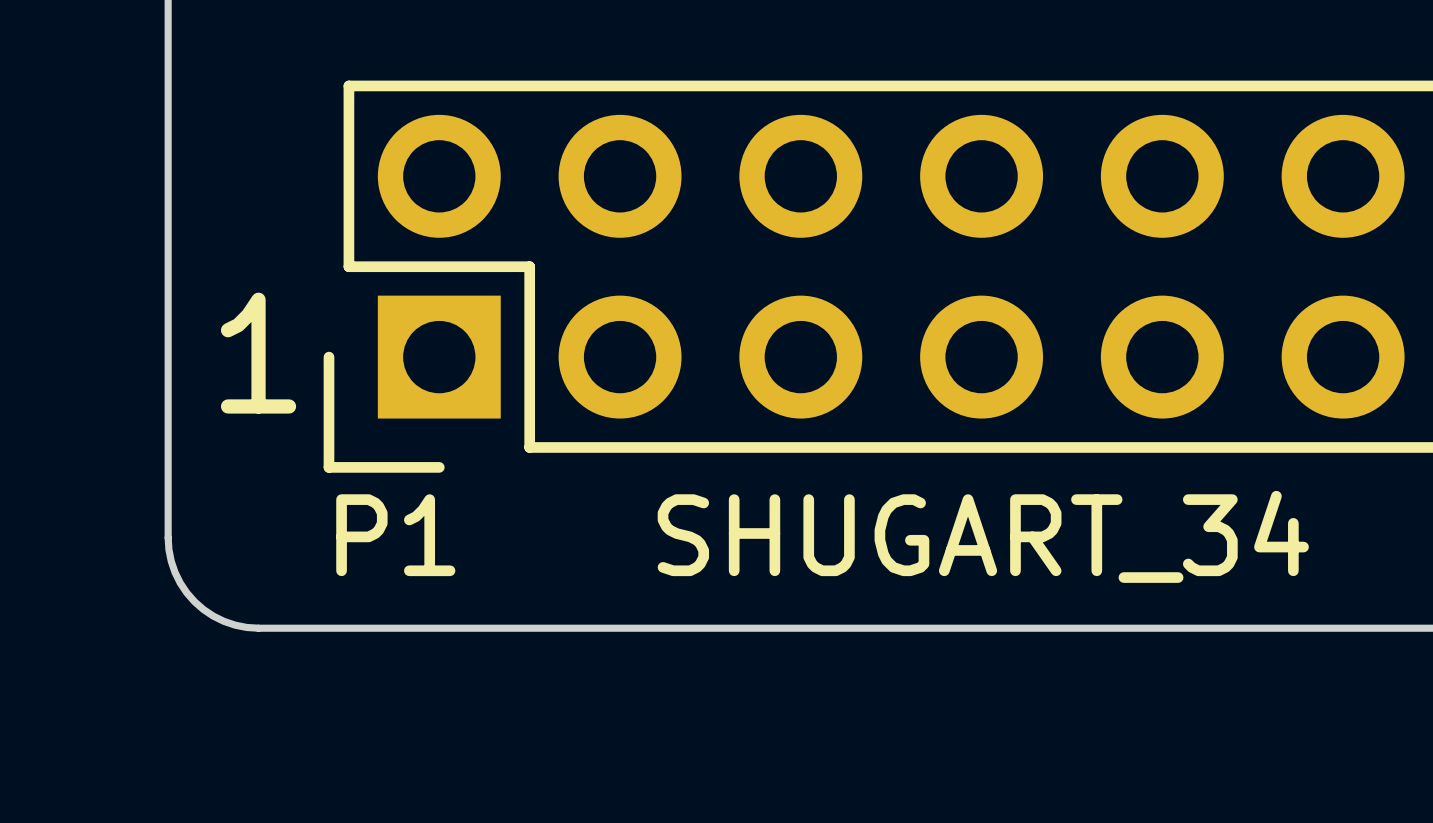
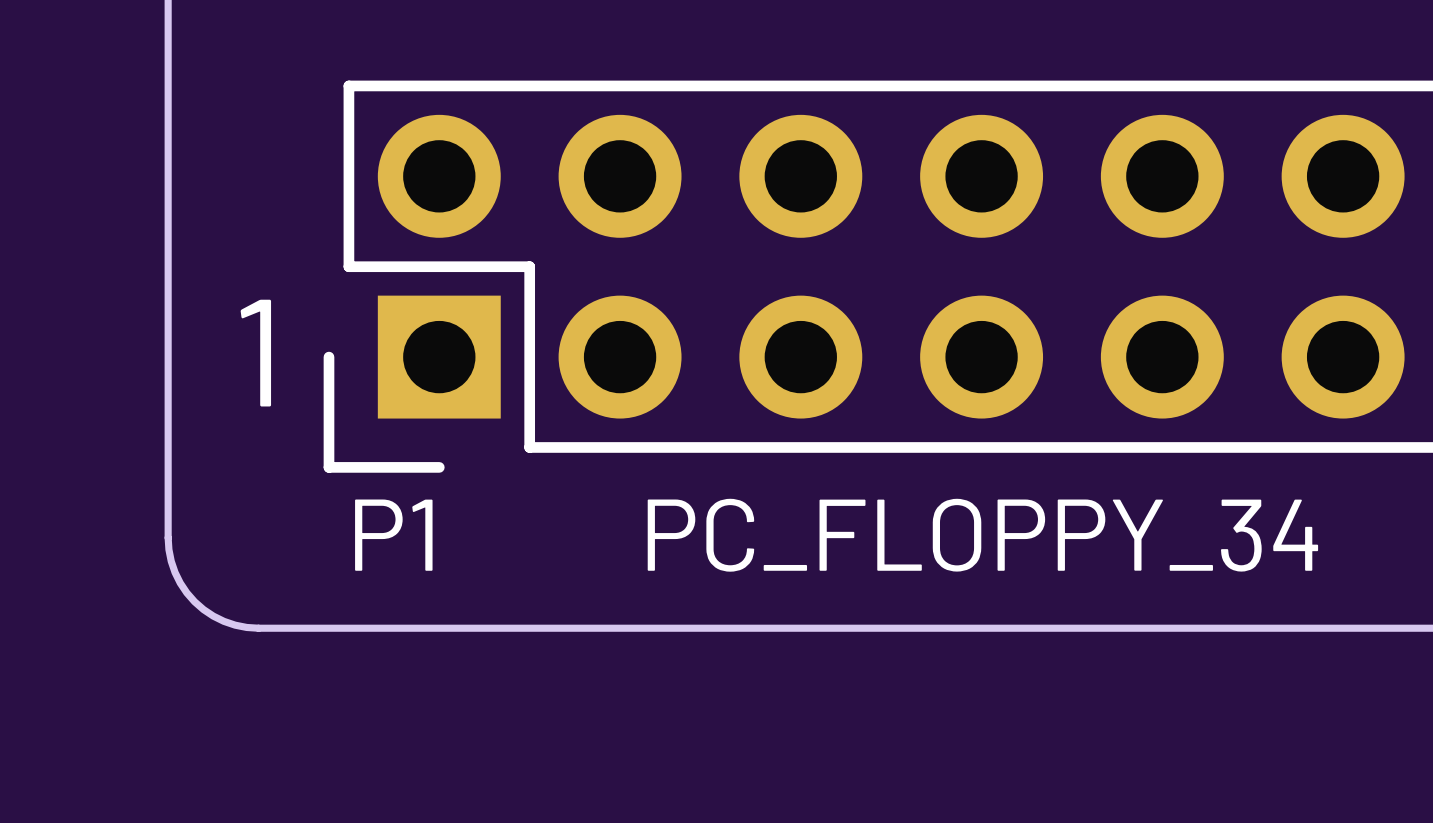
P1 value: SHUGART_34 (983, 536) -> PC_FLOPPY_34 (982, 535)

